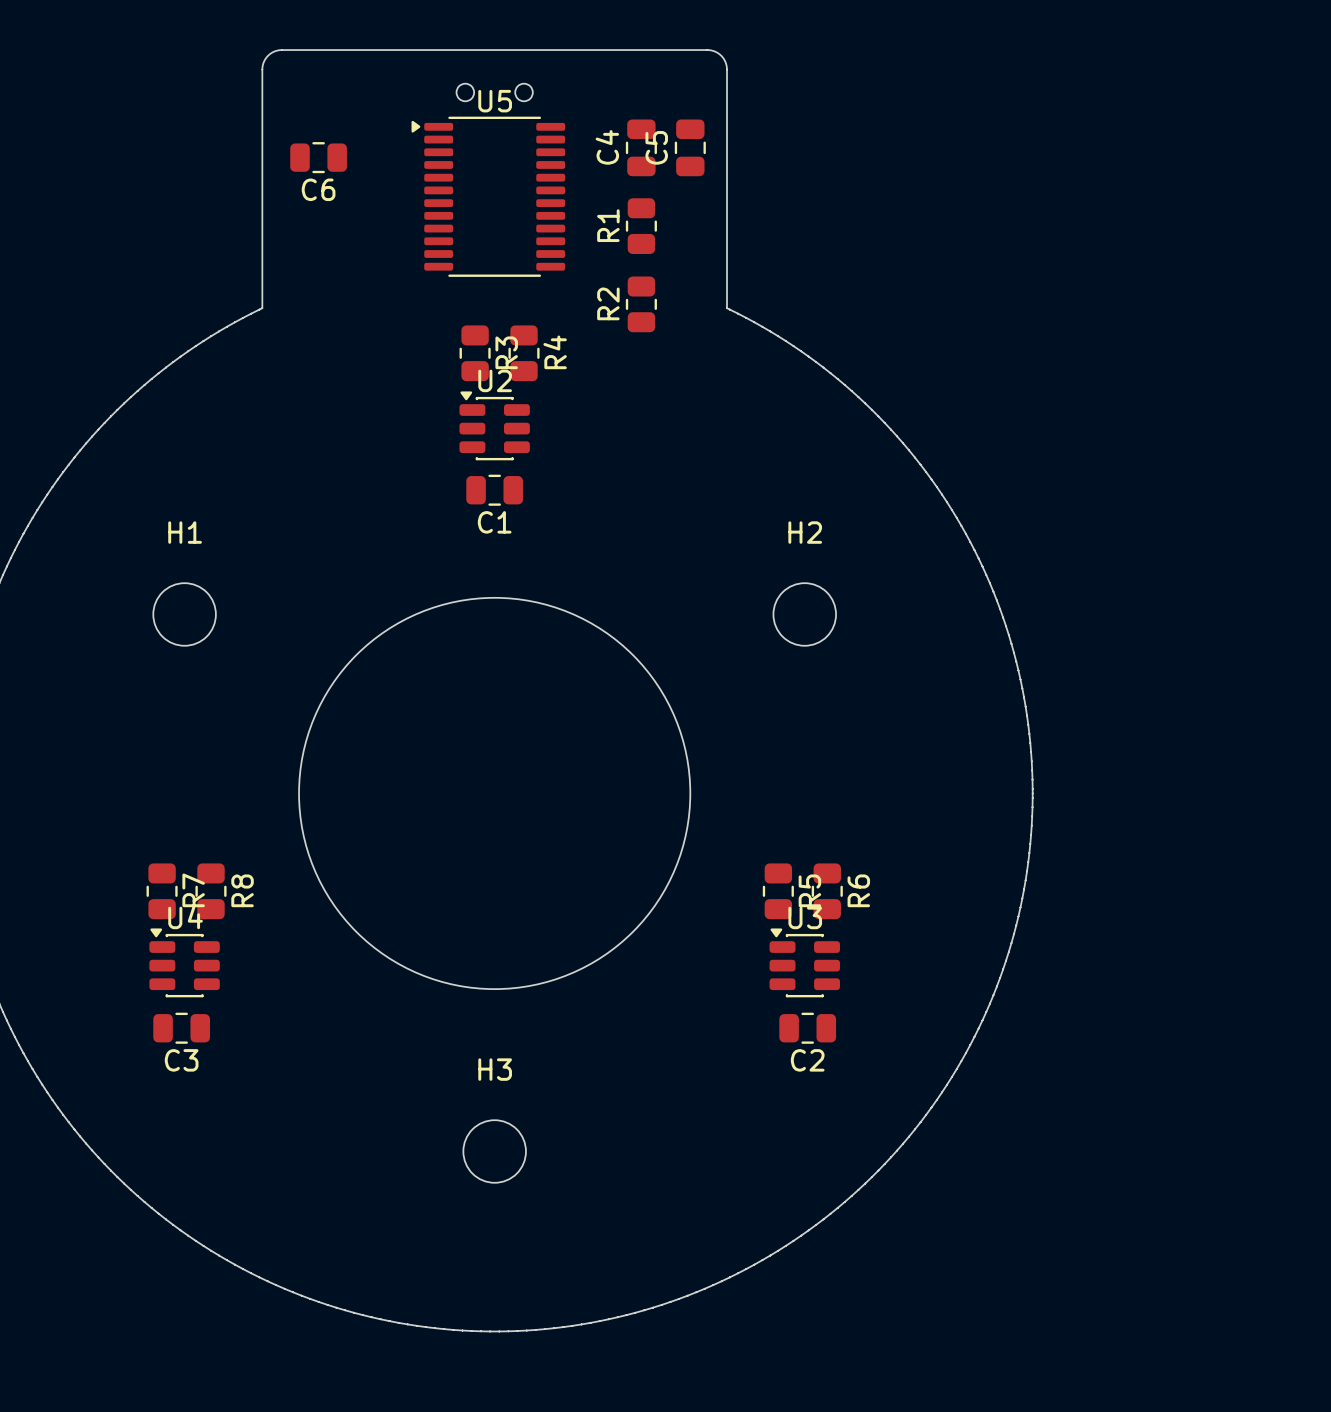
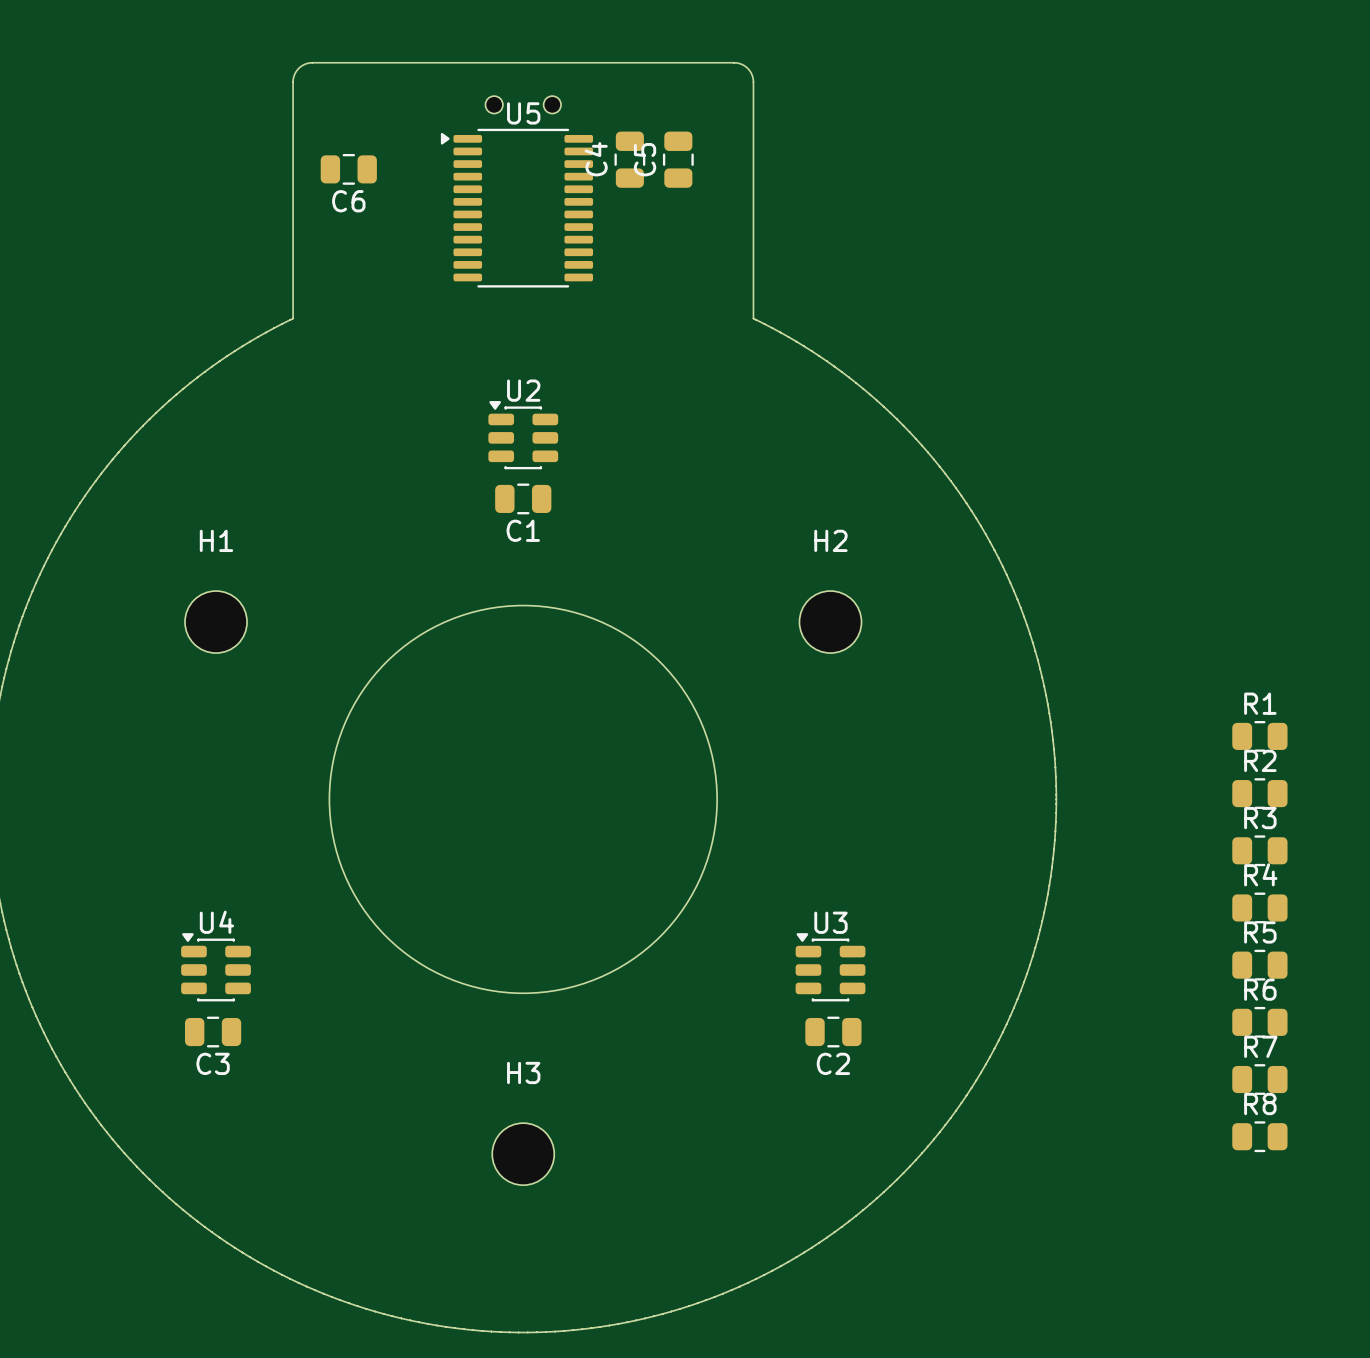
C4 position: (641, 147) -> (629, 159)
C5 position: (690, 147) -> (678, 159)
R1 rotation: 0° (641, 226) -> 90° clockwise (1259, 736)
R1 position: (641, 226) -> (1259, 736)
R2 rotation: 0° (641, 304) -> 90° clockwise (1259, 793)
R2 position: (641, 304) -> (1259, 793)
R3 name position: R3 (506, 352) -> R3 (1260, 818)
R4 name position: R4 (555, 352) -> R4 (1260, 874)
R3 rotation: 0° (475, 353) -> 90° clockwise (1259, 850)
R3 position: (475, 353) -> (1259, 850)
R4 rotation: 0° (524, 353) -> 90° clockwise (1259, 907)
R4 position: (524, 353) -> (1259, 907)
R7 name position: R7 (193, 890) -> R7 (1260, 1046)
R8 name position: R8 (242, 890) -> R8 (1260, 1104)
R5 name position: R5 (809, 890) -> R5 (1260, 932)
R6 name position: R6 (858, 890) -> R6 (1260, 989)
R7 rotation: 0° (162, 891) -> 90° clockwise (1259, 1079)
R7 position: (162, 891) -> (1259, 1079)
R8 rotation: 0° (210, 891) -> 90° clockwise (1259, 1136)
R8 position: (210, 891) -> (1259, 1136)
R5 rotation: 0° (778, 891) -> 90° clockwise (1259, 965)
R5 position: (778, 891) -> (1259, 965)
R6 rotation: 0° (827, 891) -> 90° clockwise (1259, 1022)
R6 position: (827, 891) -> (1259, 1022)

